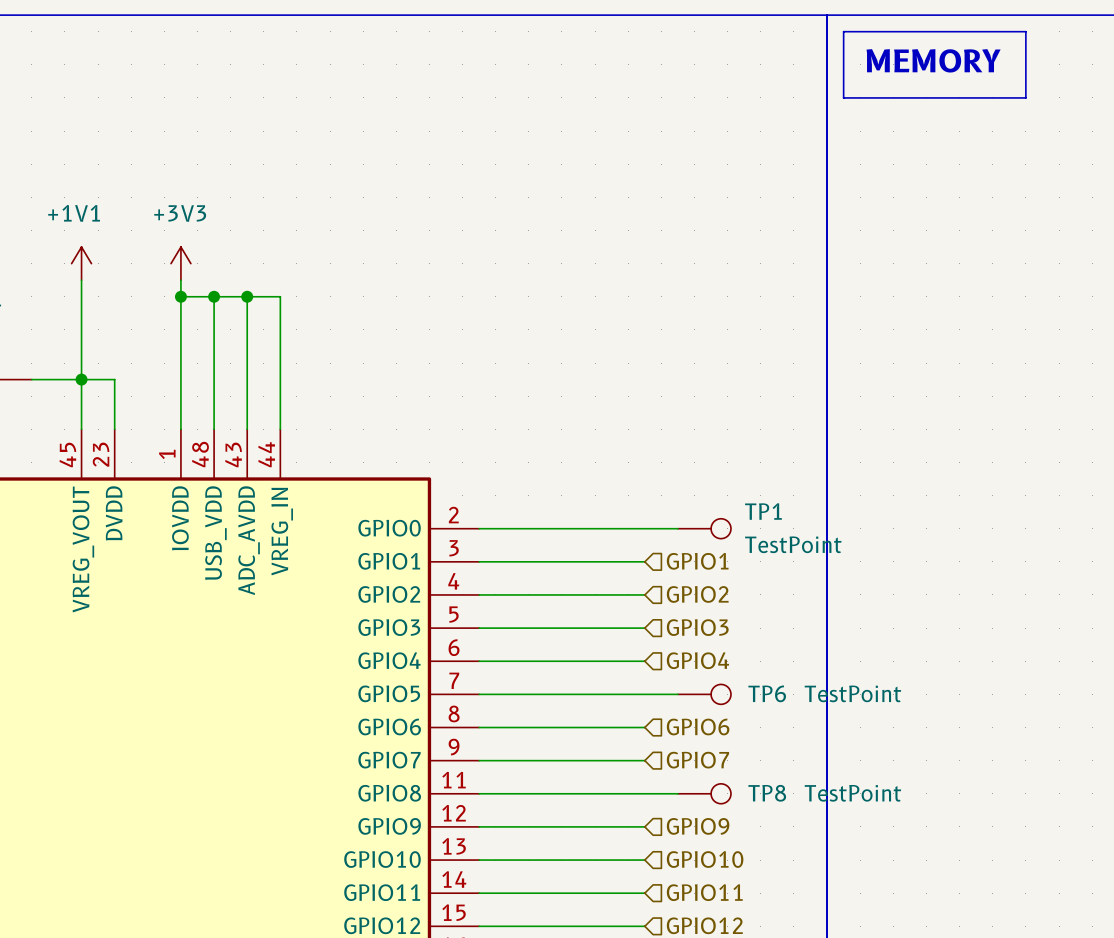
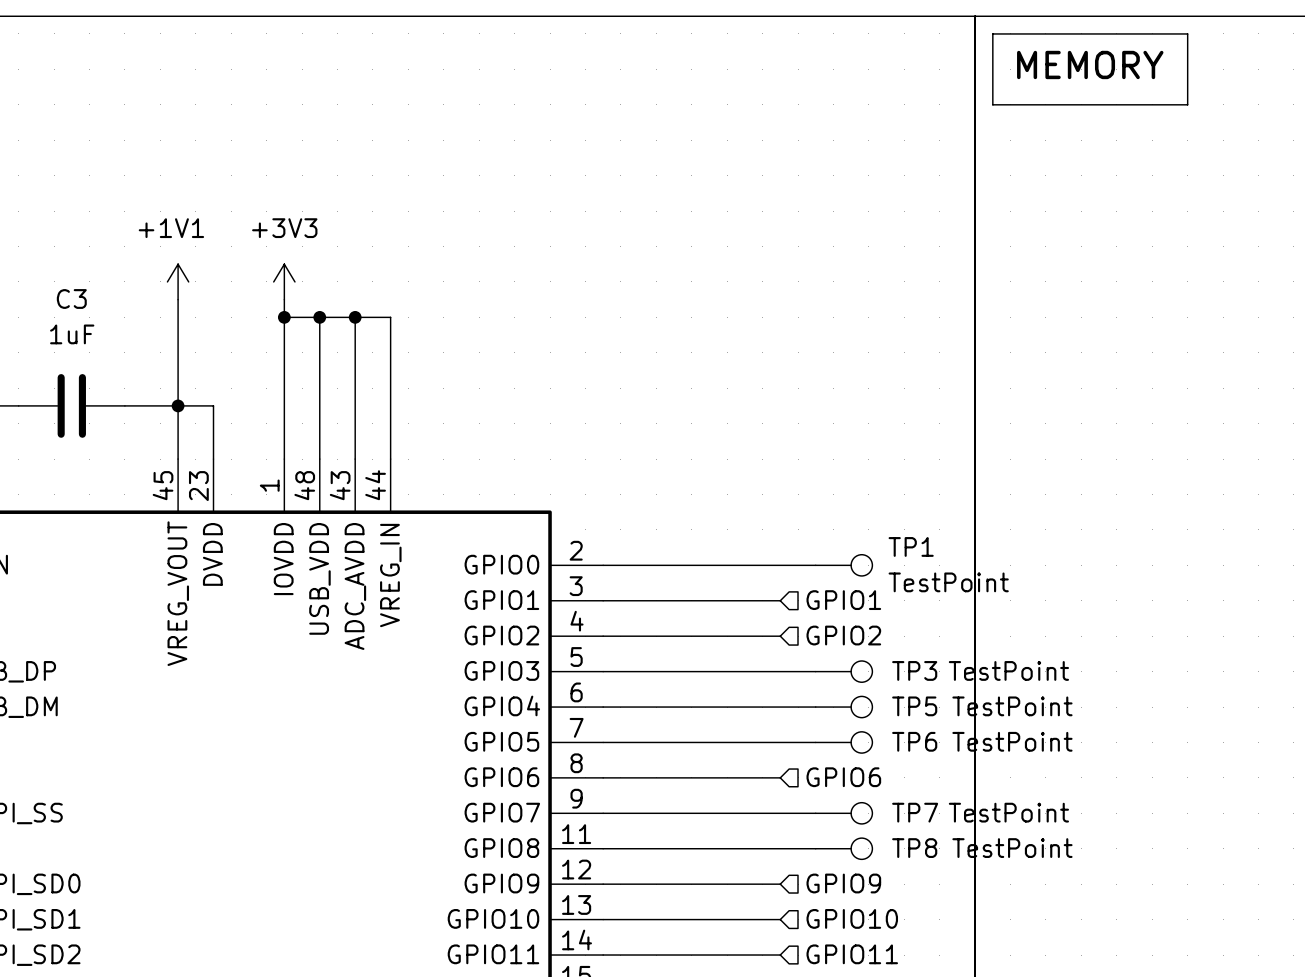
hierarchical label: GPIO3 (697, 627) -> none
wire: none -> (780, 671) (815, 671)
TP3: none -> TestPoint (844, 671)
hierarchical label: GPIO4 (697, 660) -> none
wire: none -> (780, 707) (815, 707)
TP5: none -> TestPoint (844, 707)
wire: none -> (780, 813) (815, 813)
hierarchical label: GPIO7 (697, 760) -> none
TP7: none -> TestPoint (844, 813)

